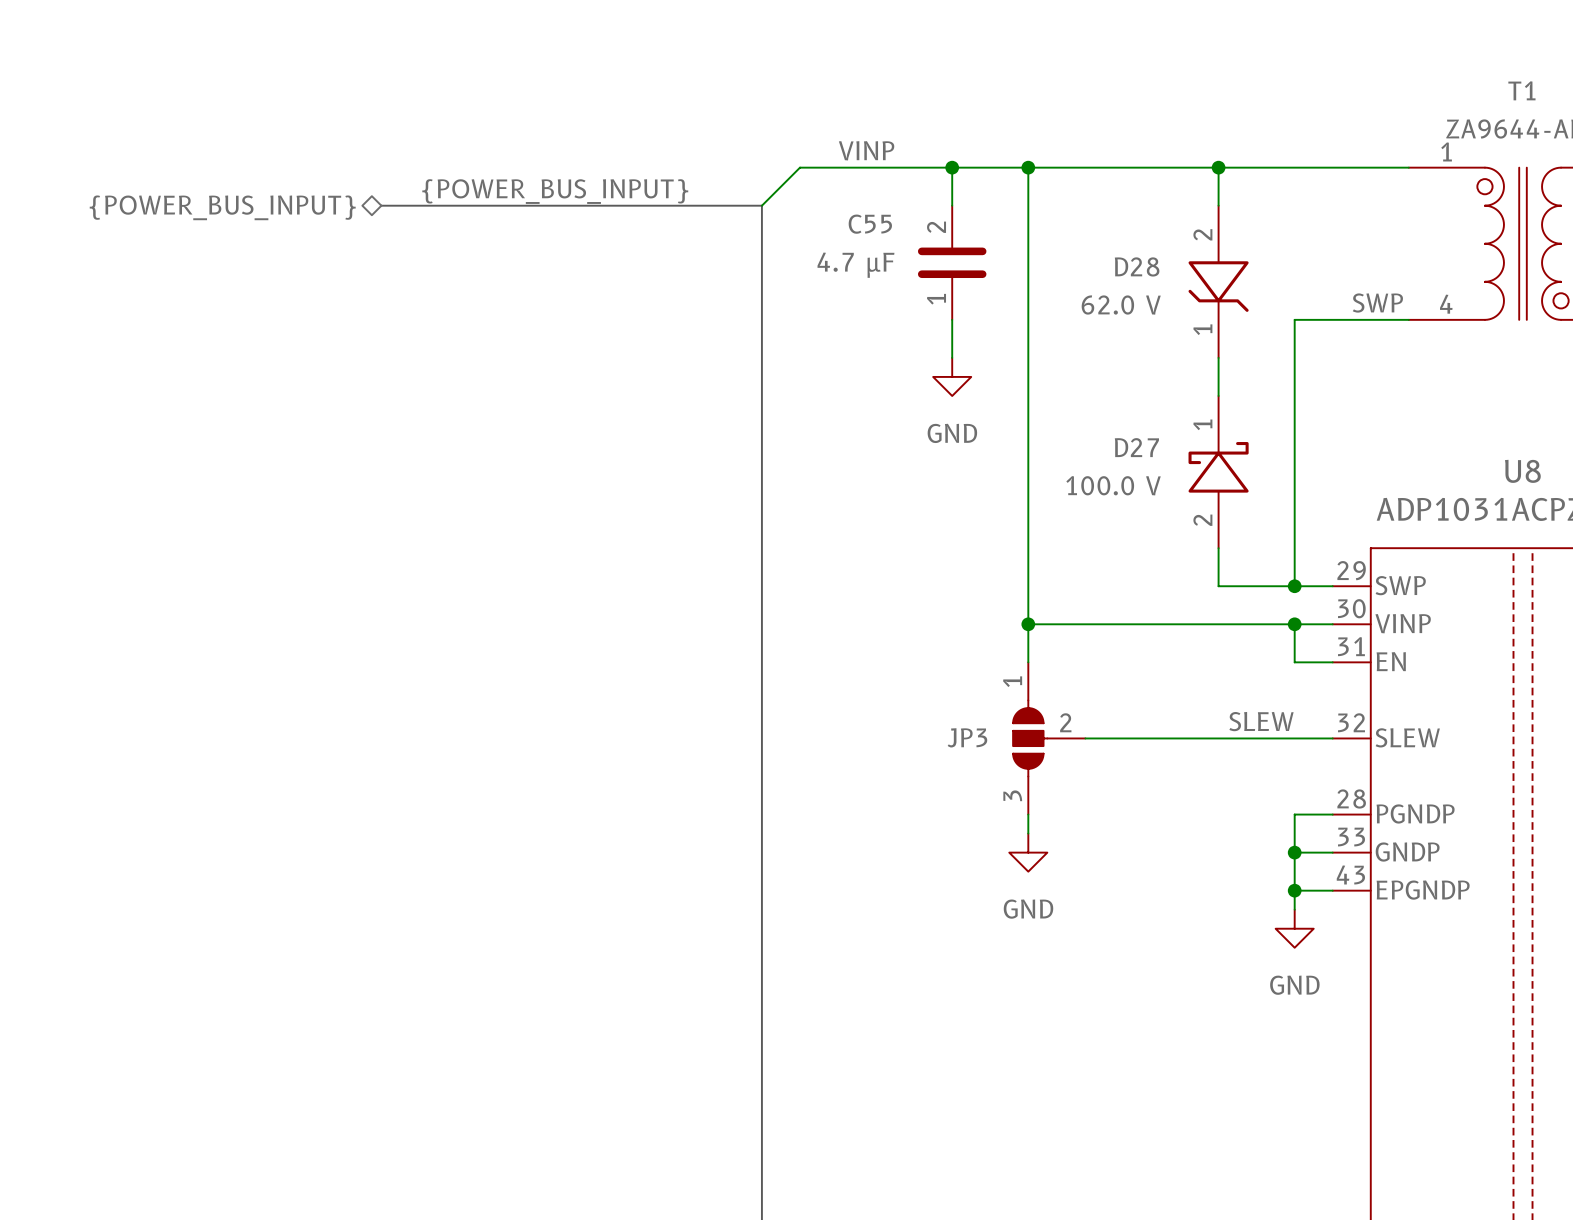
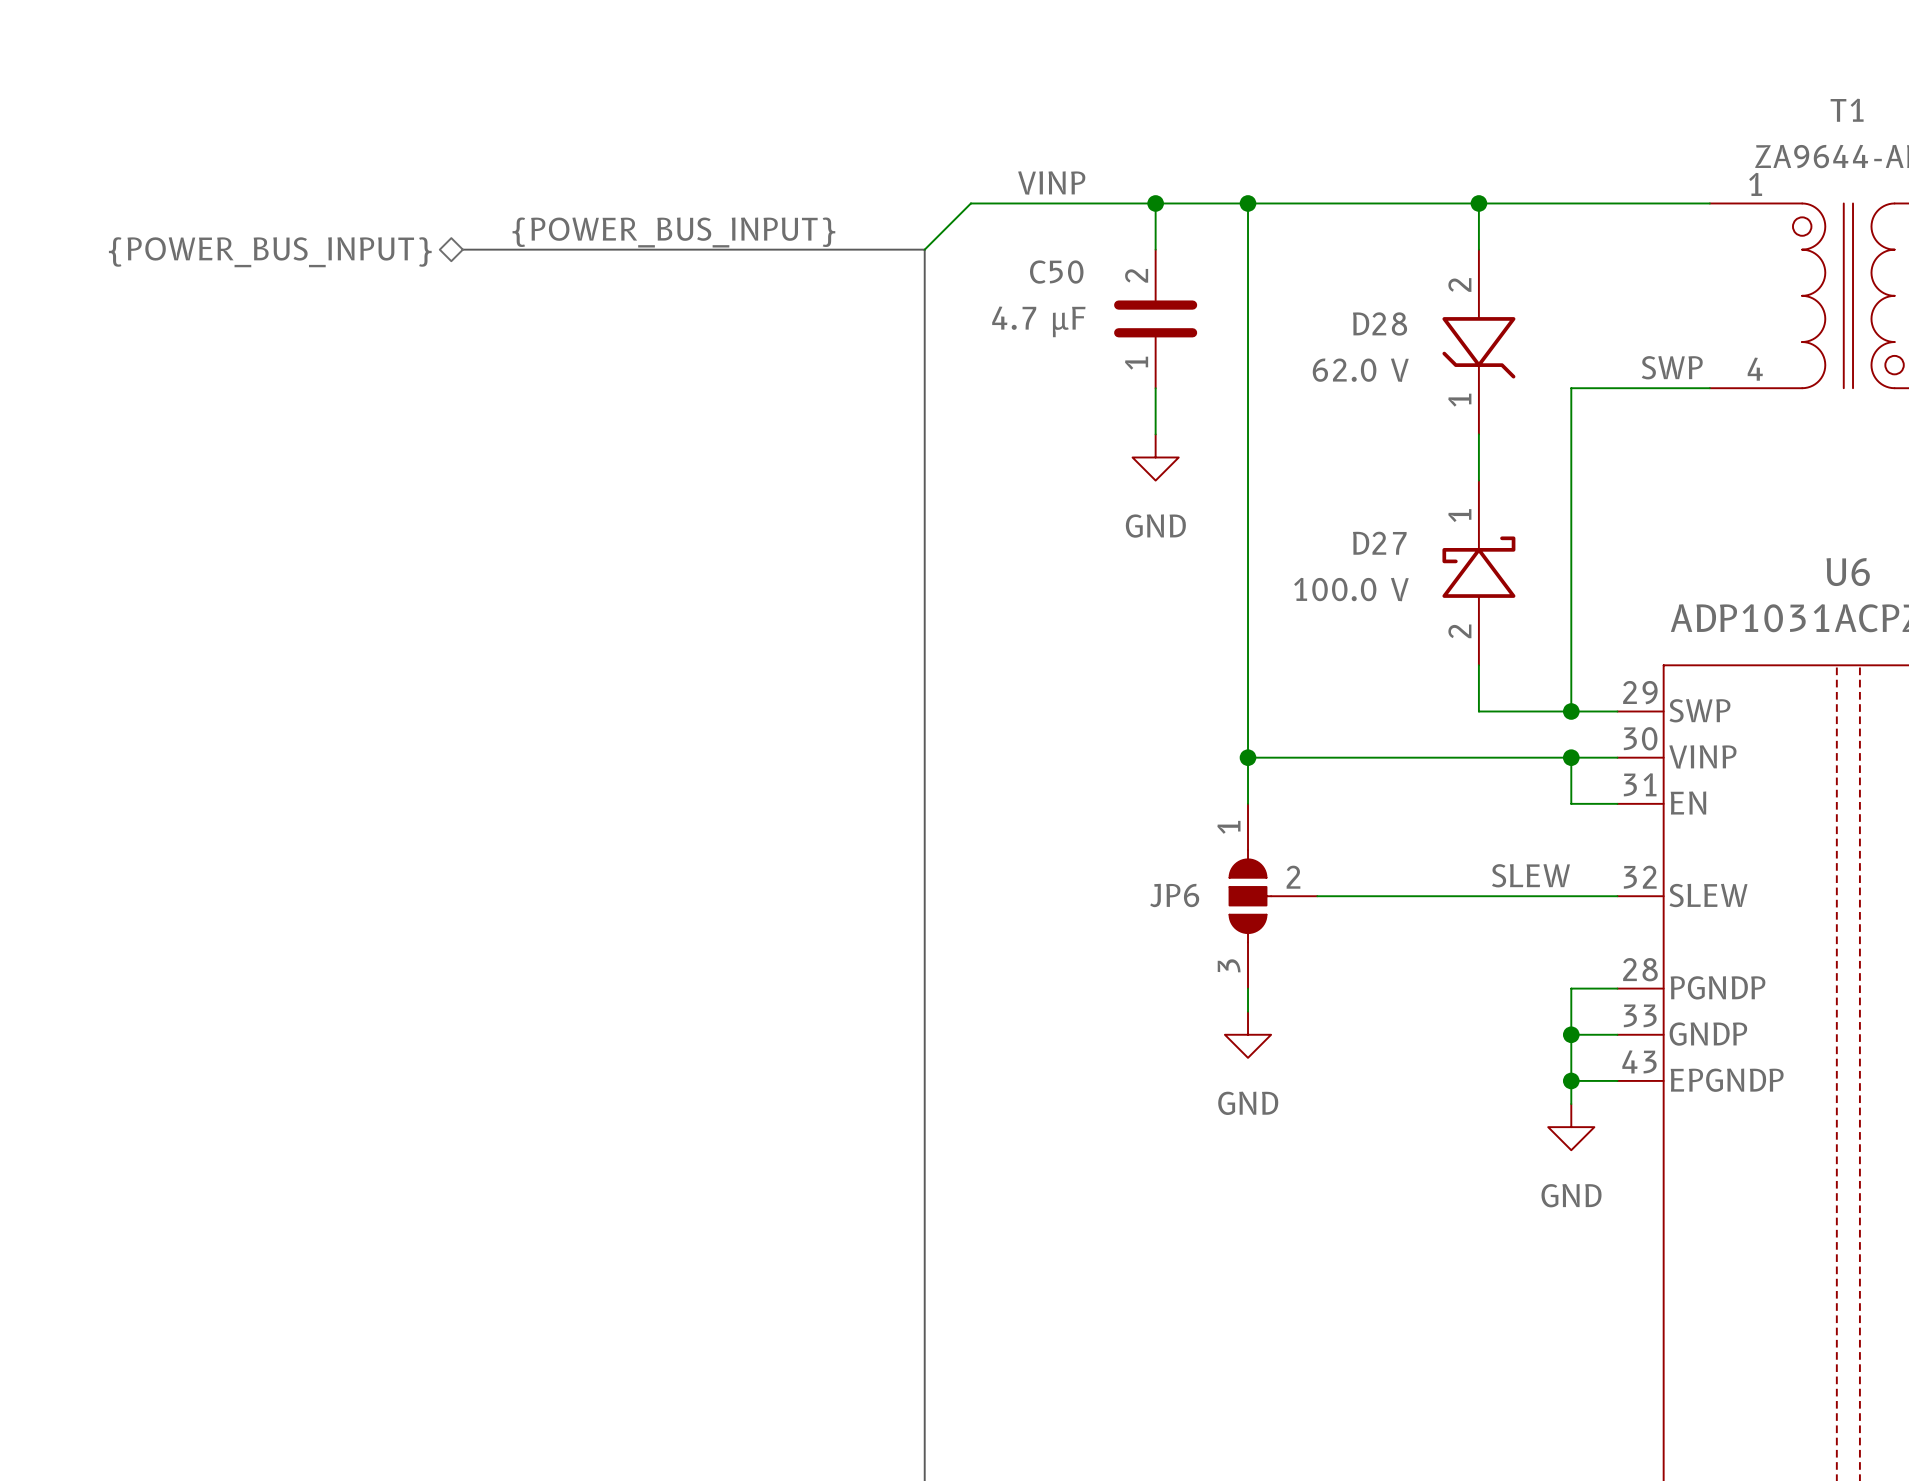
C55 name: C55 (870, 224) -> C50 (1056, 272)
U8 name: U8 (1522, 471) -> U6 (1848, 572)
JP3 name: JP3 (967, 737) -> JP6 (1174, 895)

